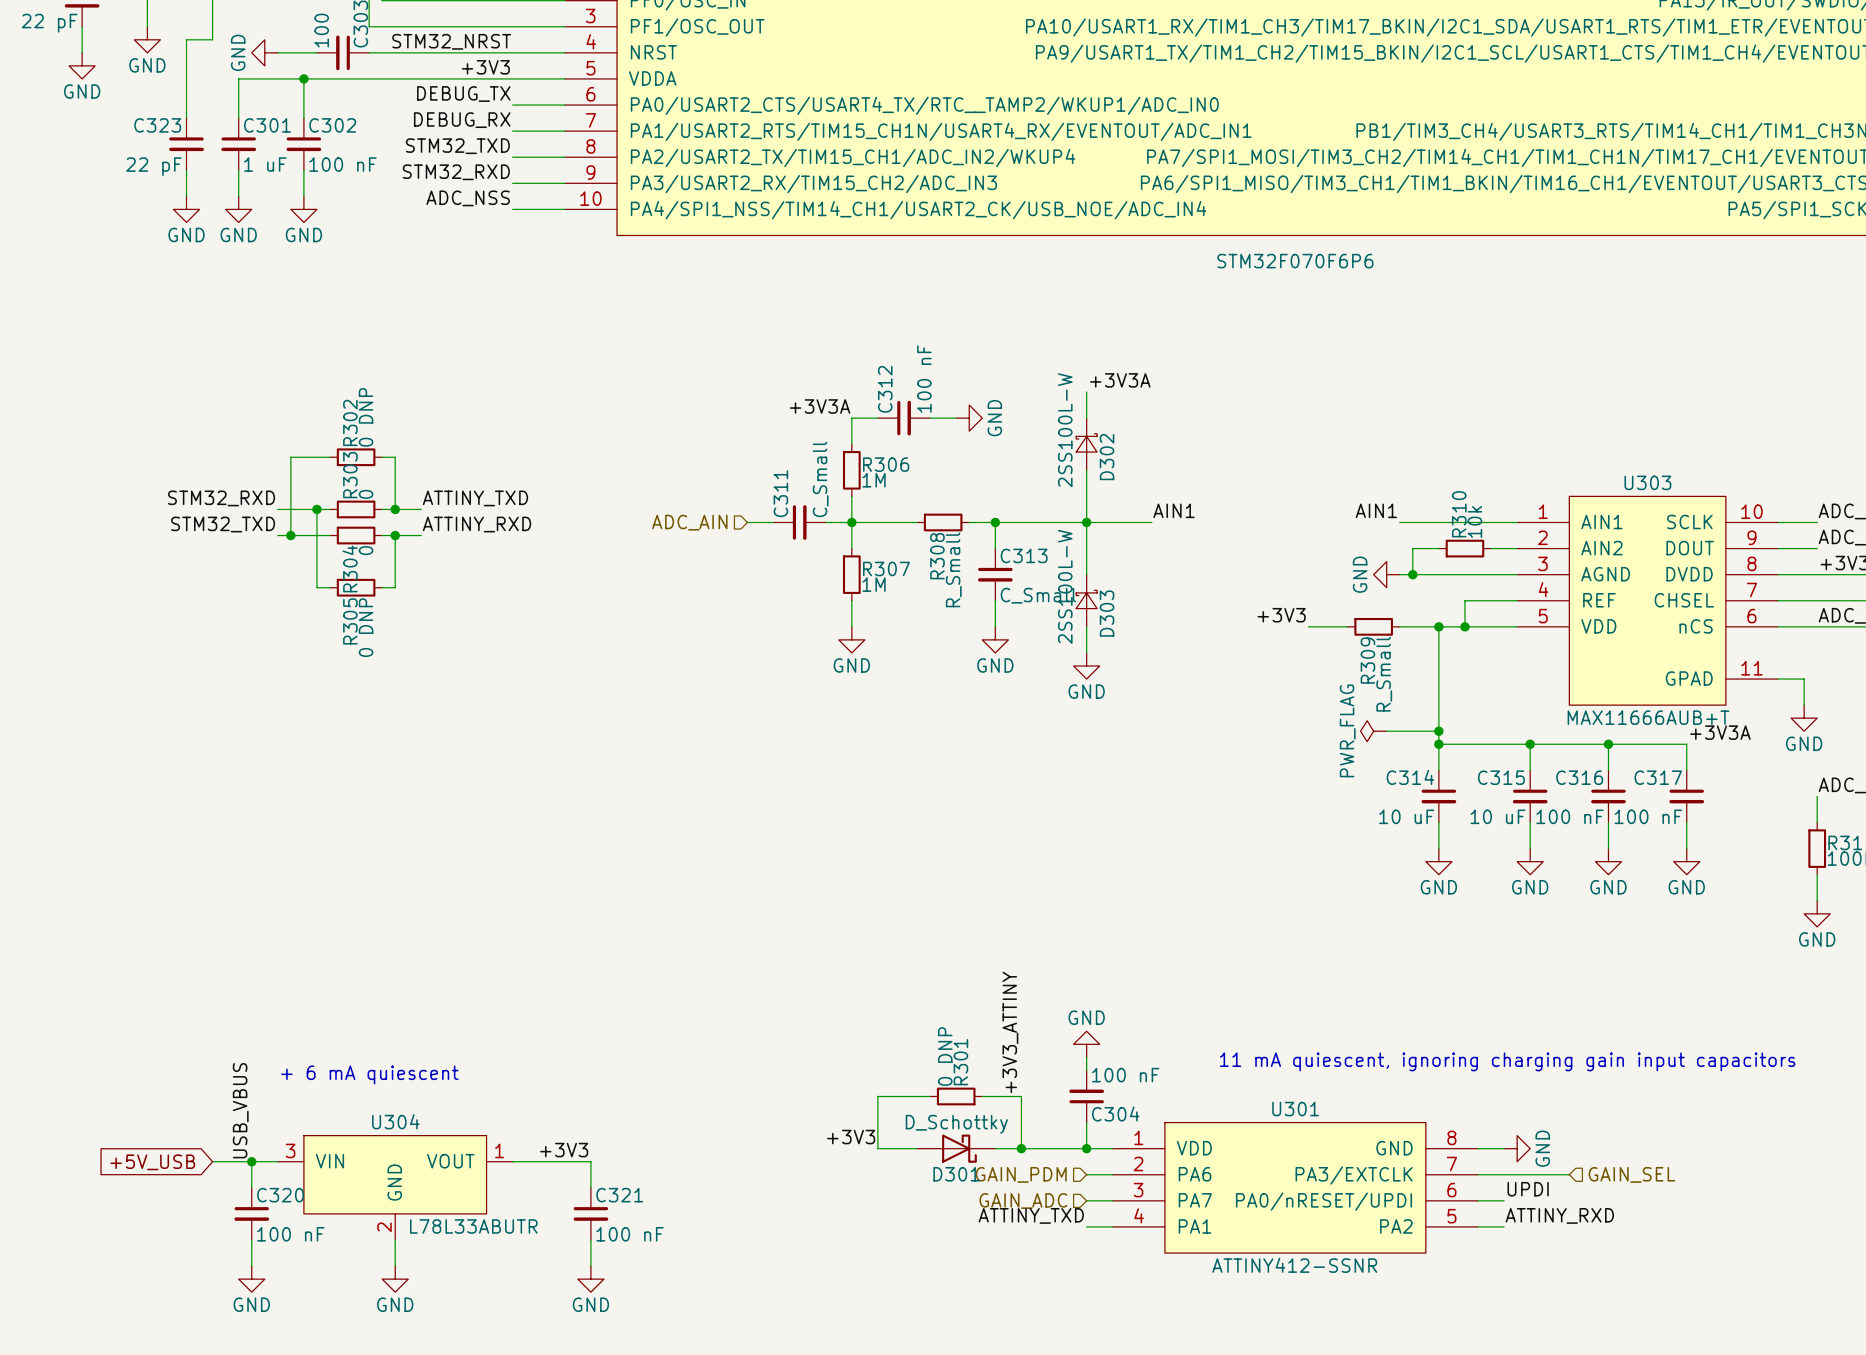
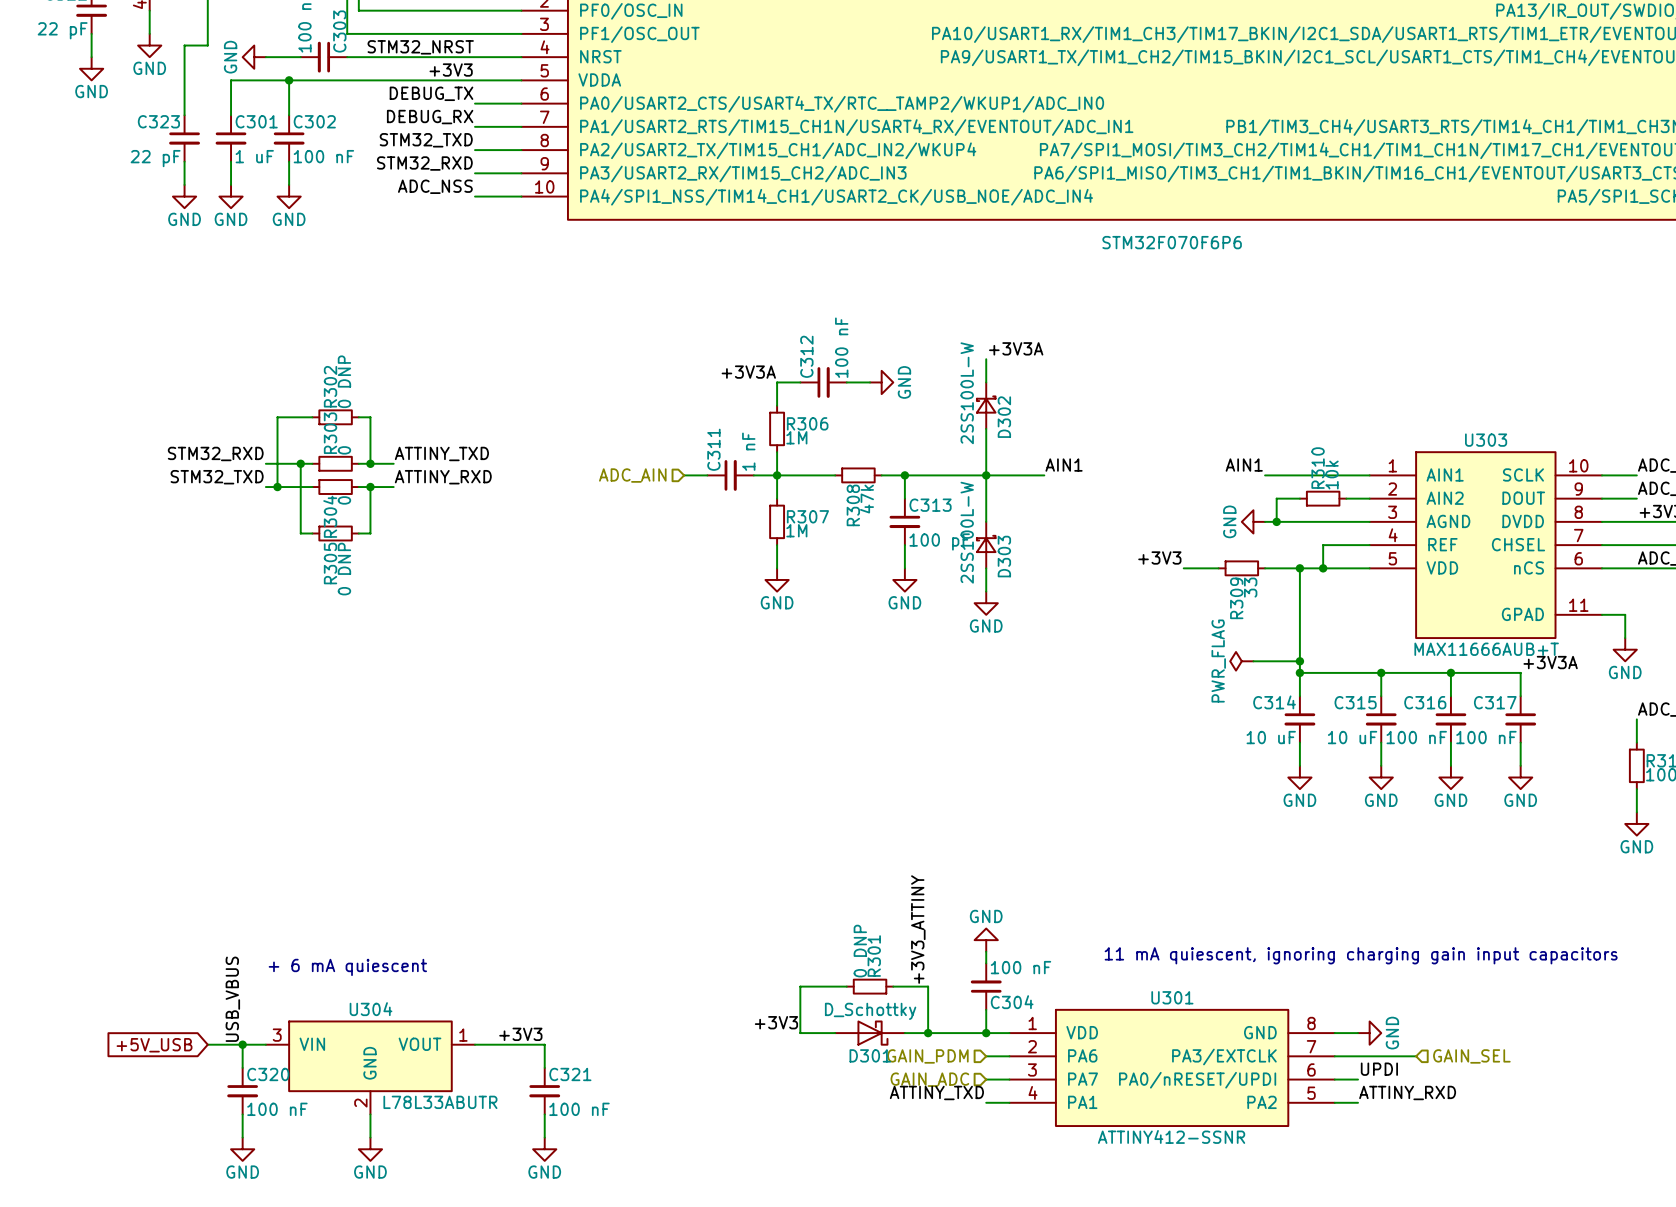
C311 value: C_Small (820, 479) -> 1 nF (748, 451)
R308 value: R_Small (953, 569) -> 47k (867, 499)
C313 value: C_Small (1038, 595) -> 100 pF (939, 541)
R309 value: R_Small (1384, 674) -> 33 (1250, 587)

